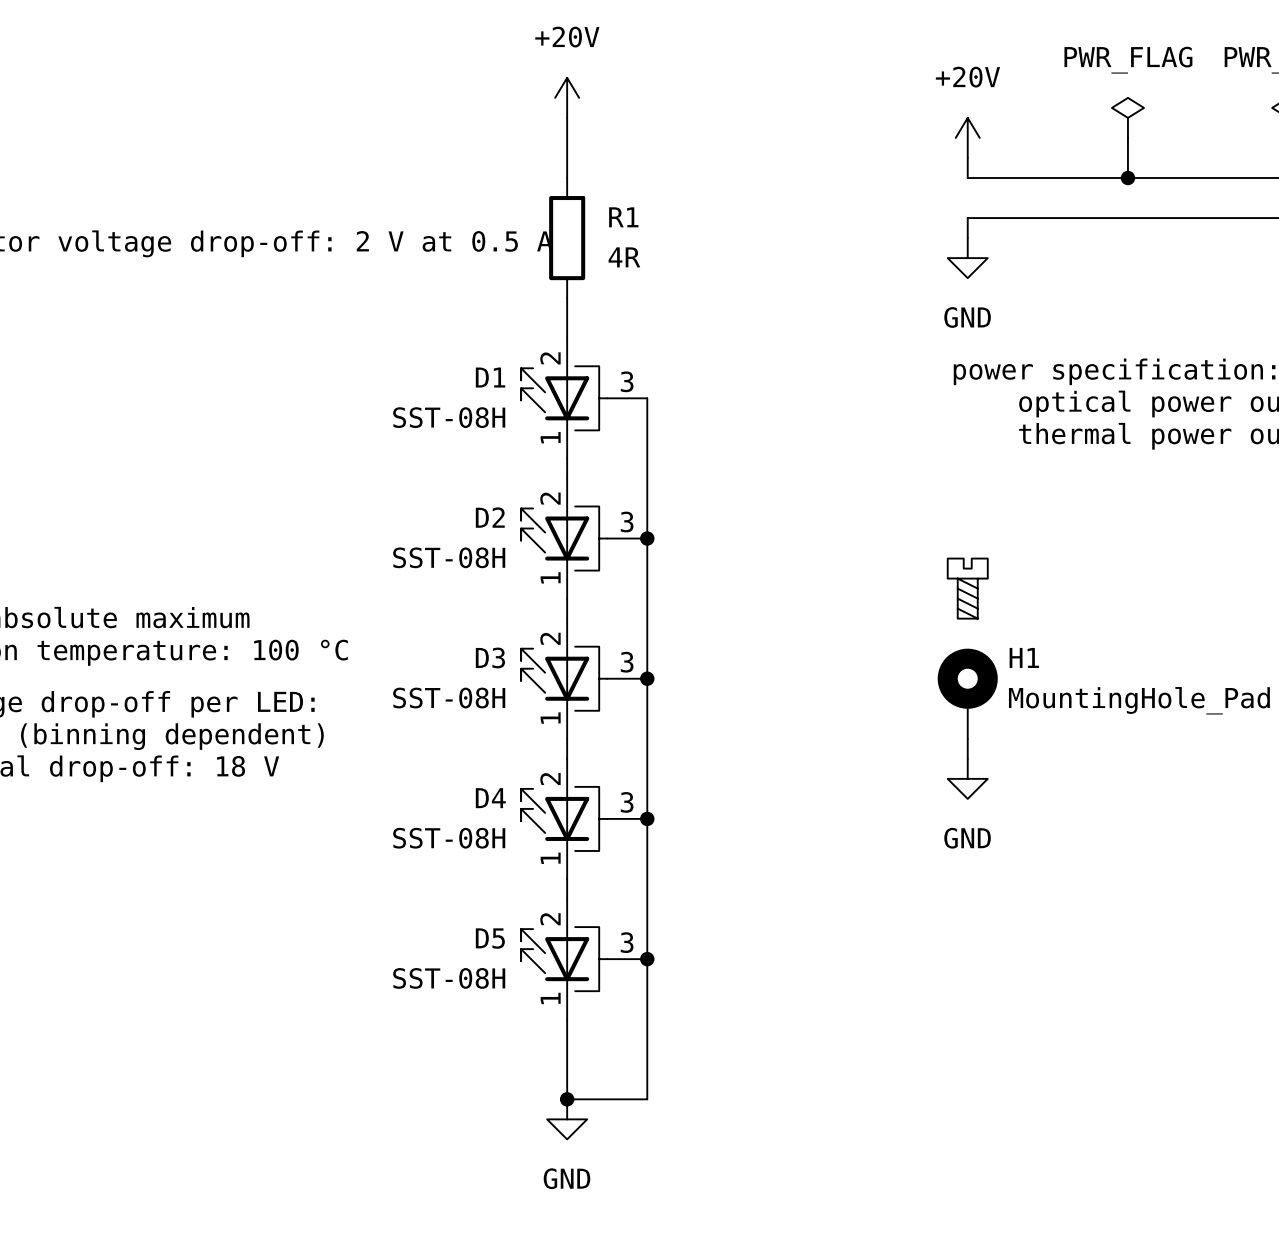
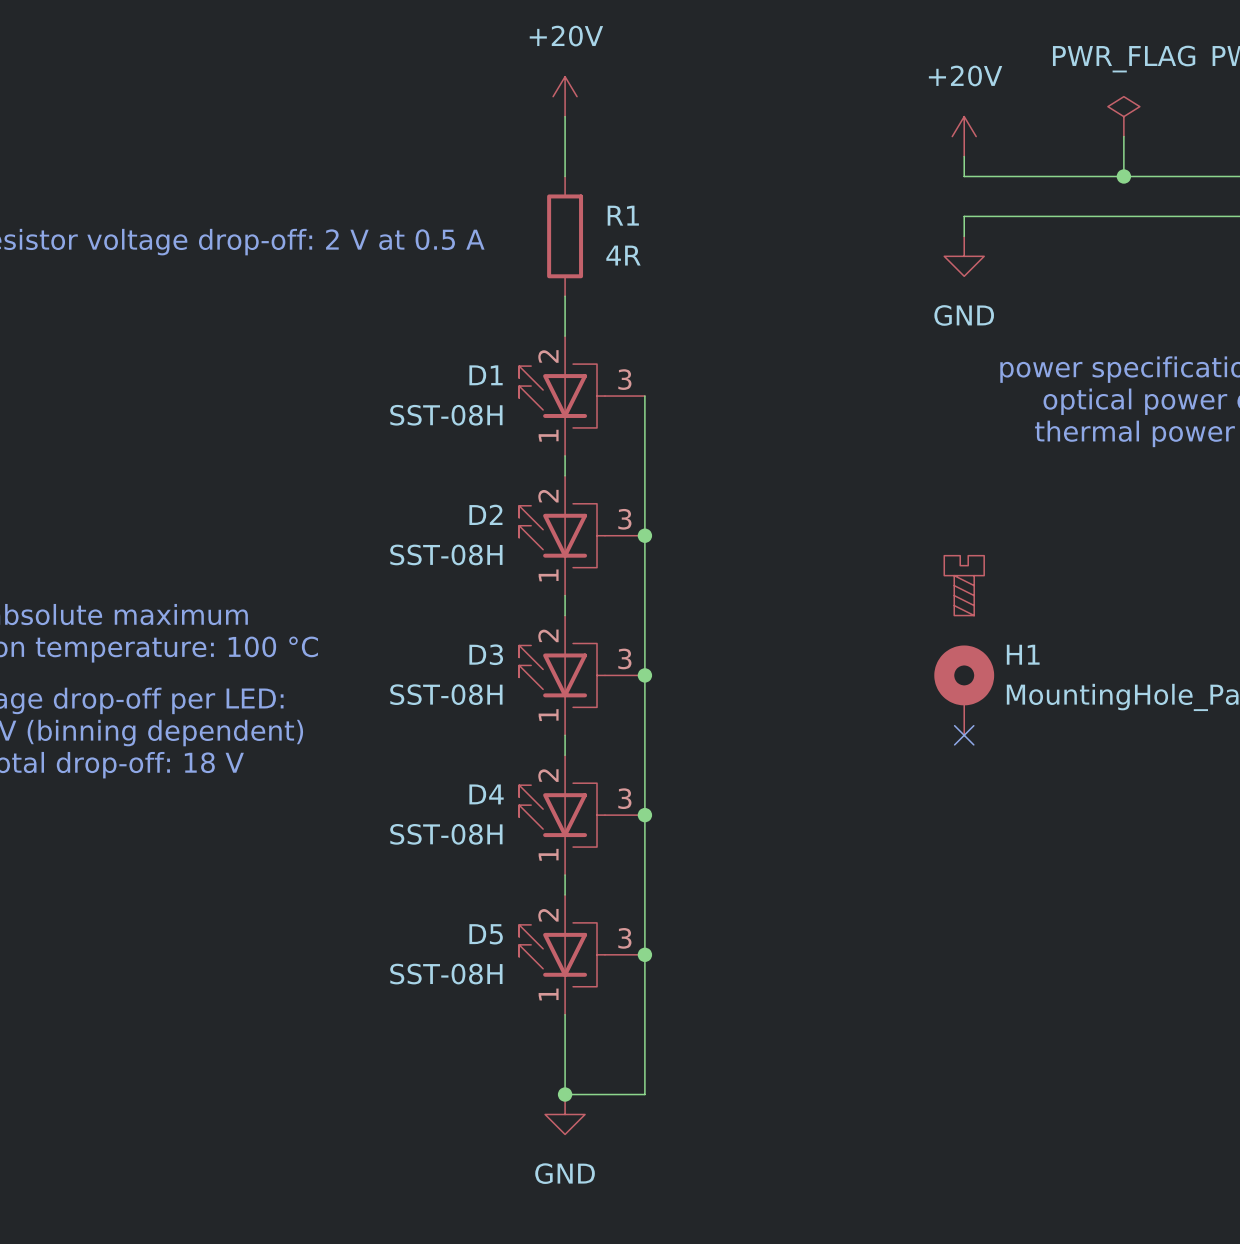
wire: (967, 738) (967, 758) -> none
no-connect mark: none -> (964, 735)
power symbol: GND (967, 778) -> none

